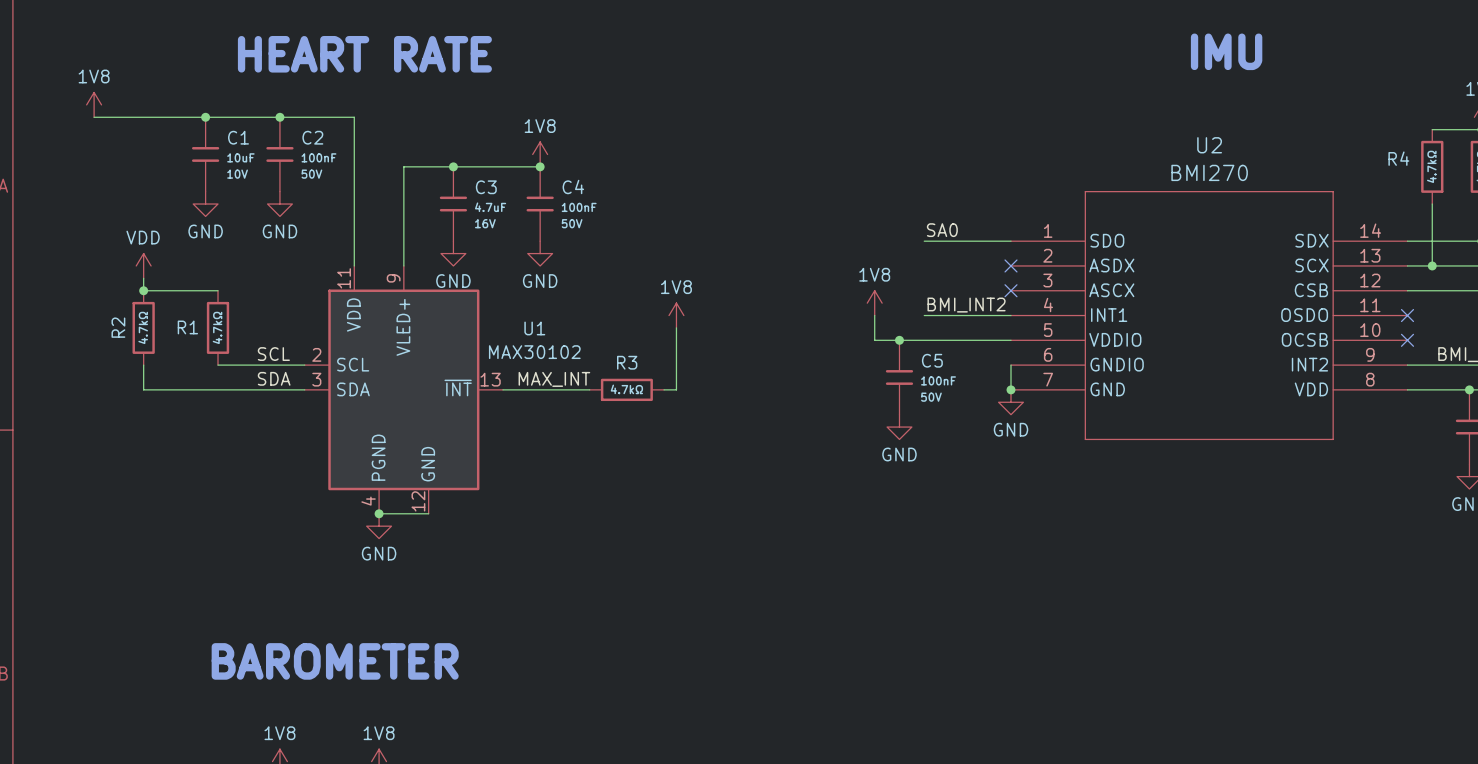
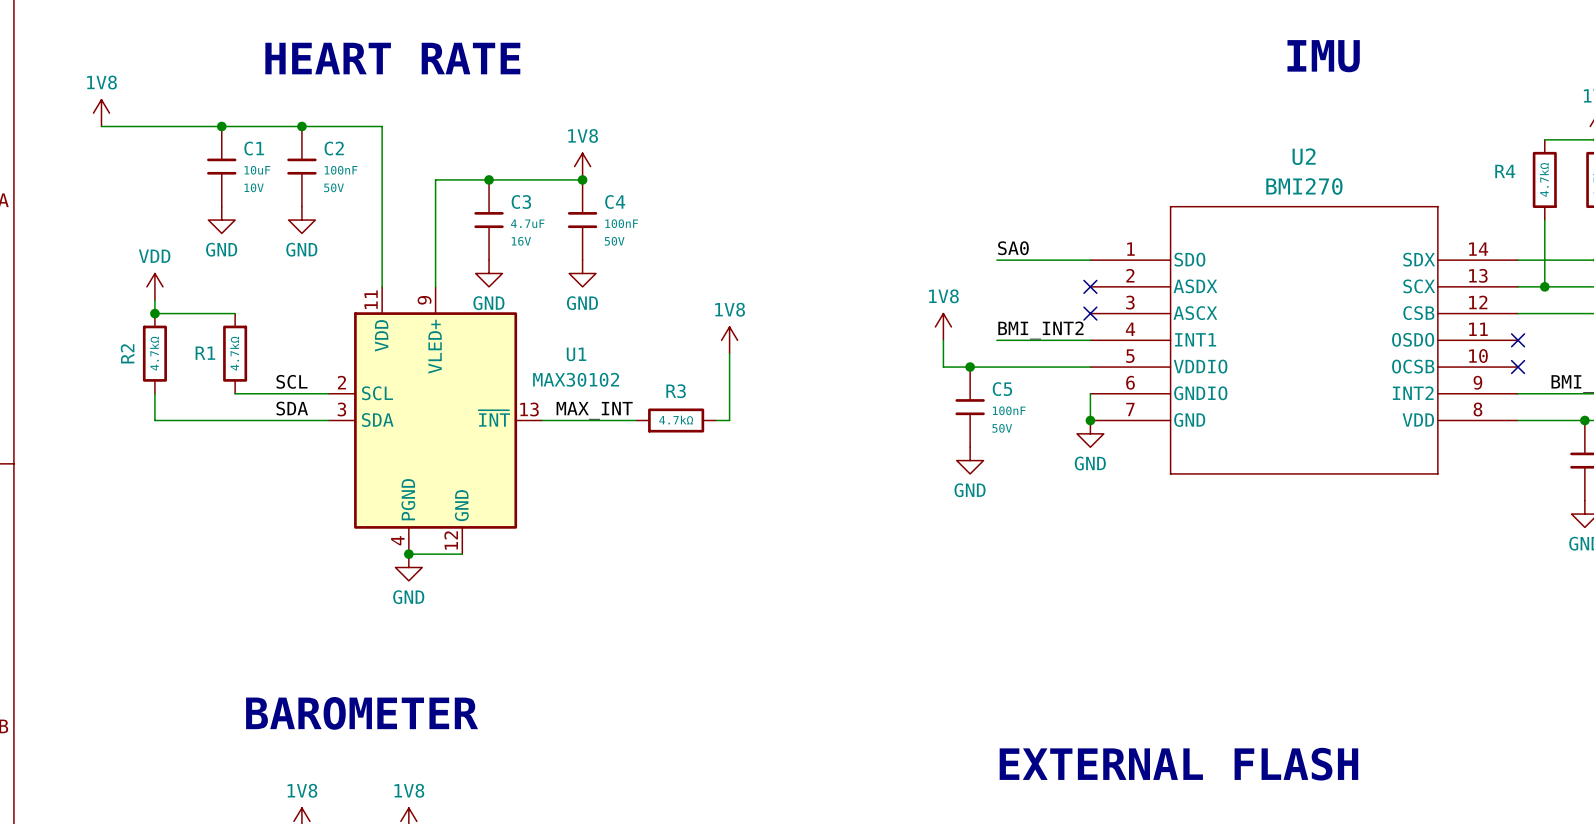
text: none -> EXTERNAL FLASH (1178, 764)

